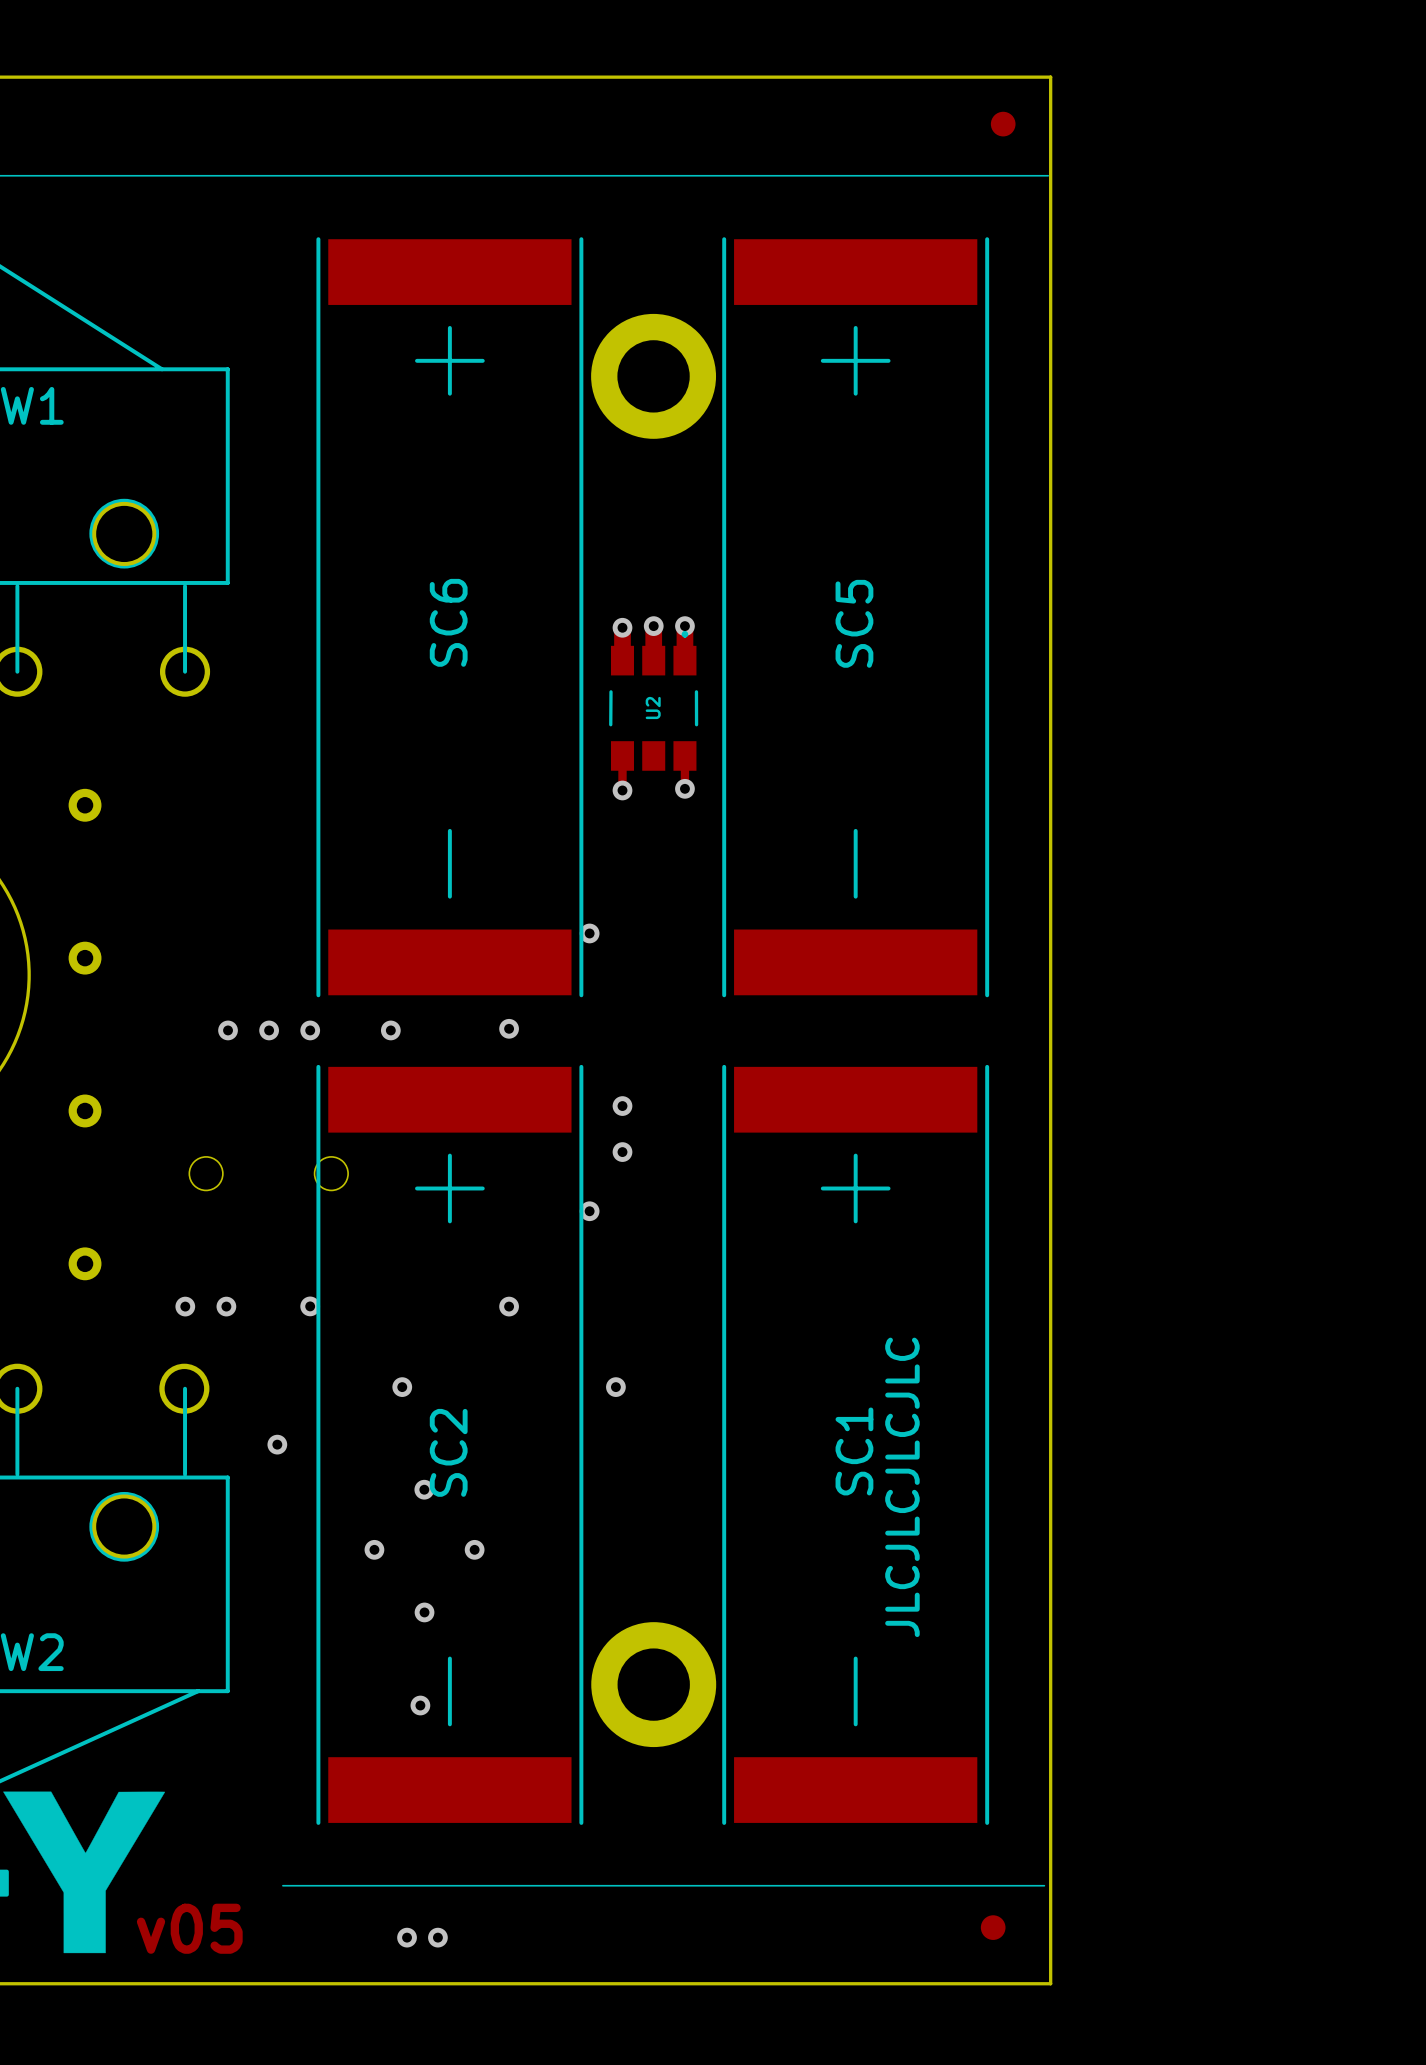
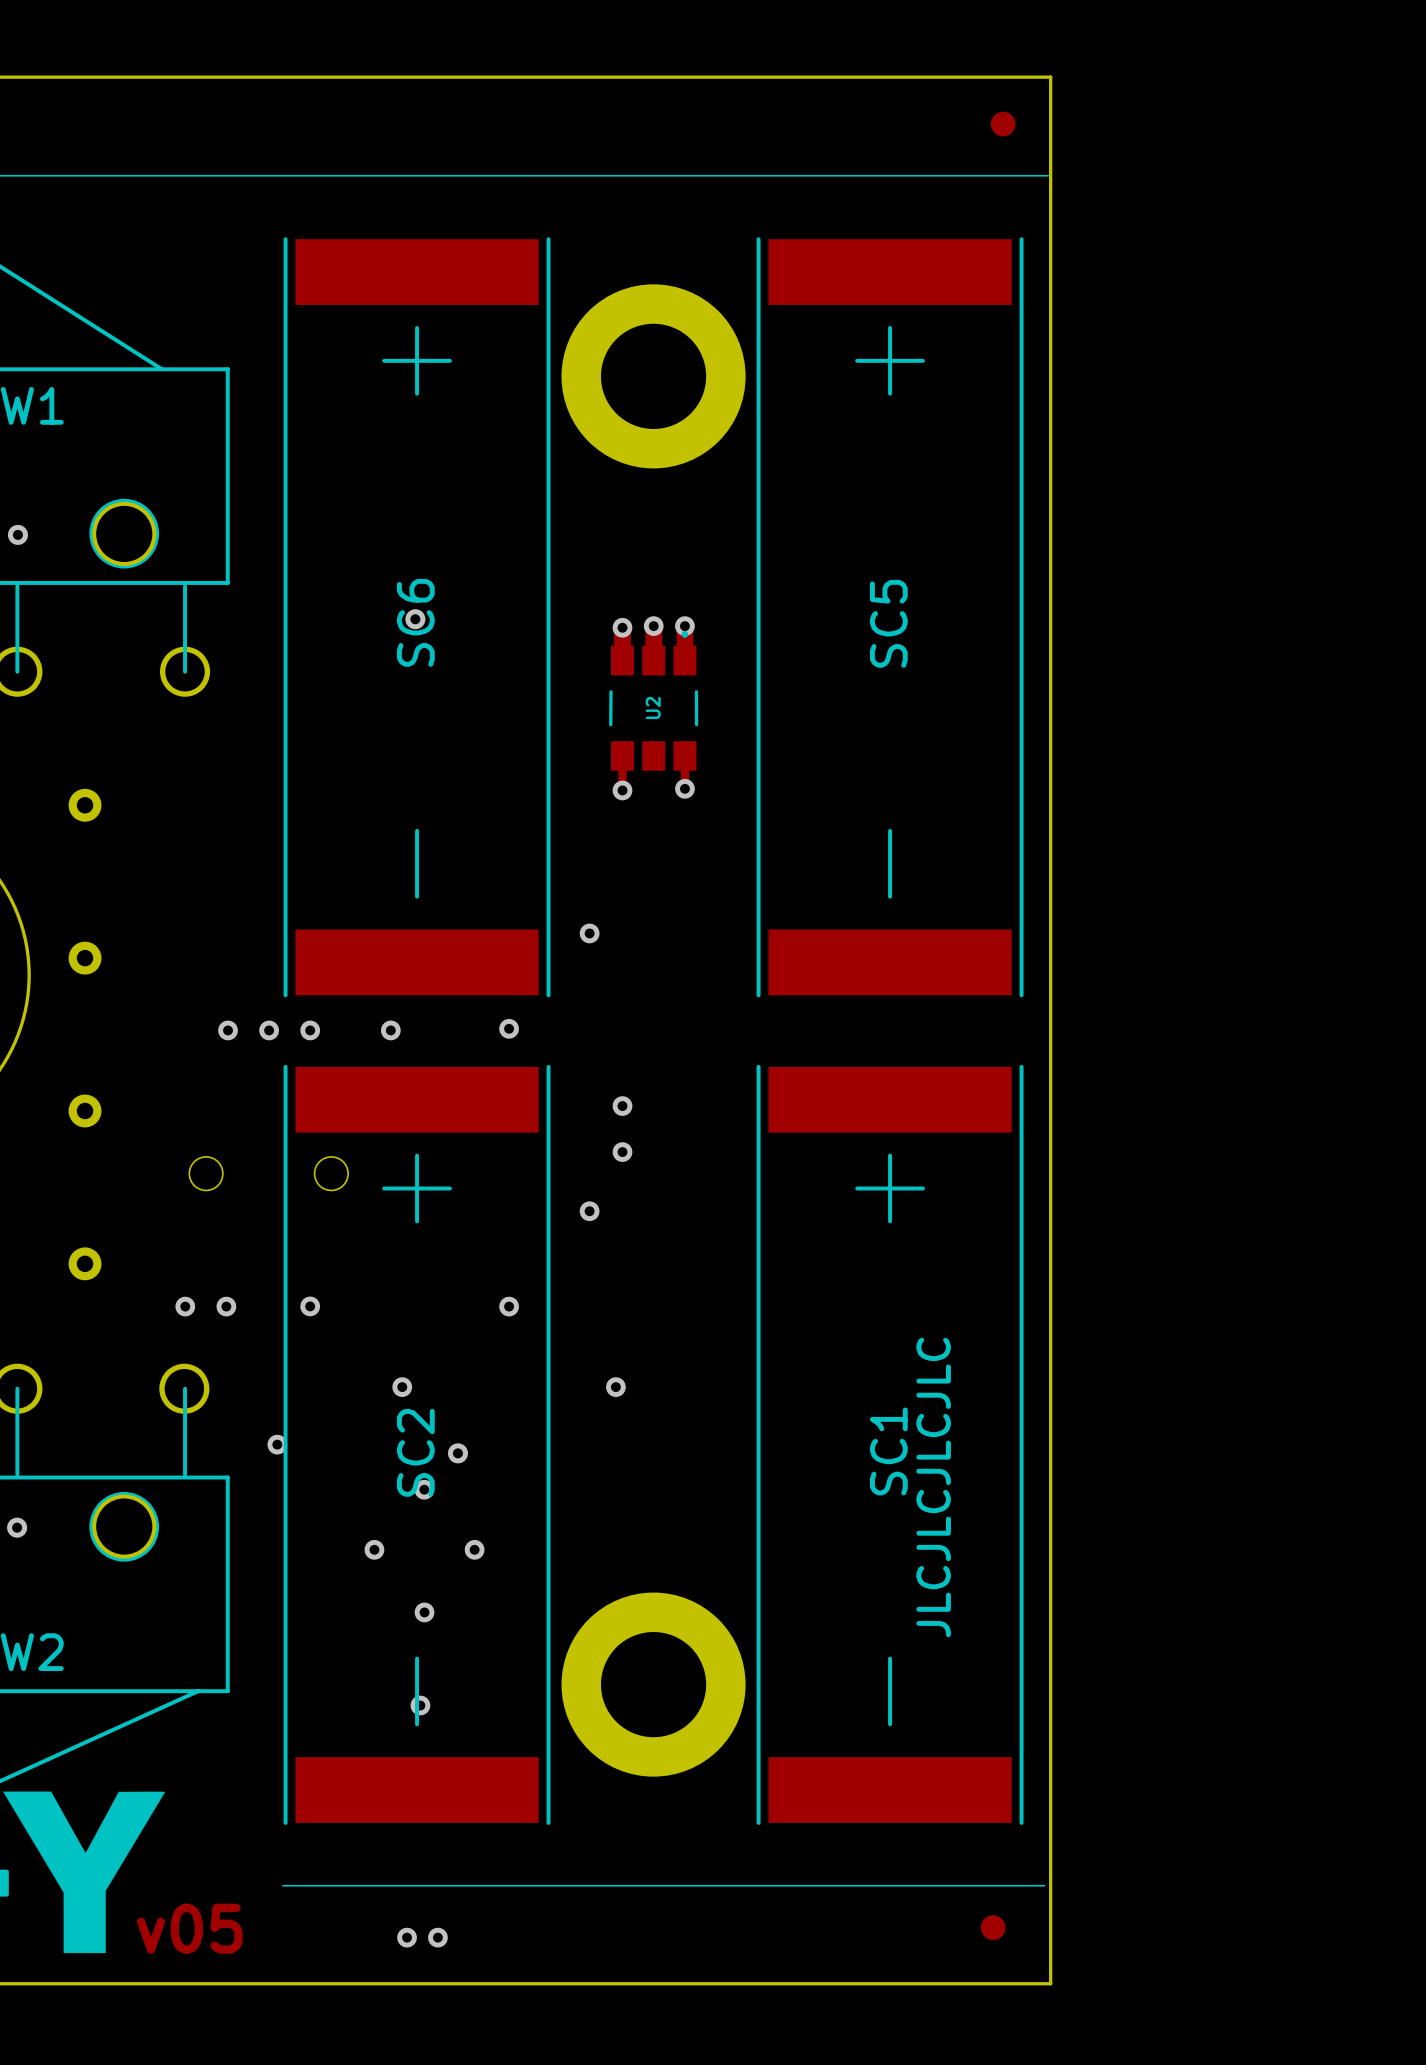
part footprint: [591, 313, 717, 439] -> [561, 284, 746, 469]
via: none -> (17, 534)
SC6 position: (449, 617) -> (417, 617)
SC5 position: (855, 617) -> (890, 617)
via: none -> (415, 619)
SC2 position: (449, 1444) -> (417, 1444)
SC1 position: (855, 1444) -> (890, 1444)
via: none -> (457, 1453)
text position: JLCJLCJLCJLC (902, 1487) -> JLCJLCJLCJLC (933, 1487)
via: none -> (17, 1527)
part footprint: [591, 1622, 717, 1748] -> [561, 1592, 746, 1777]

